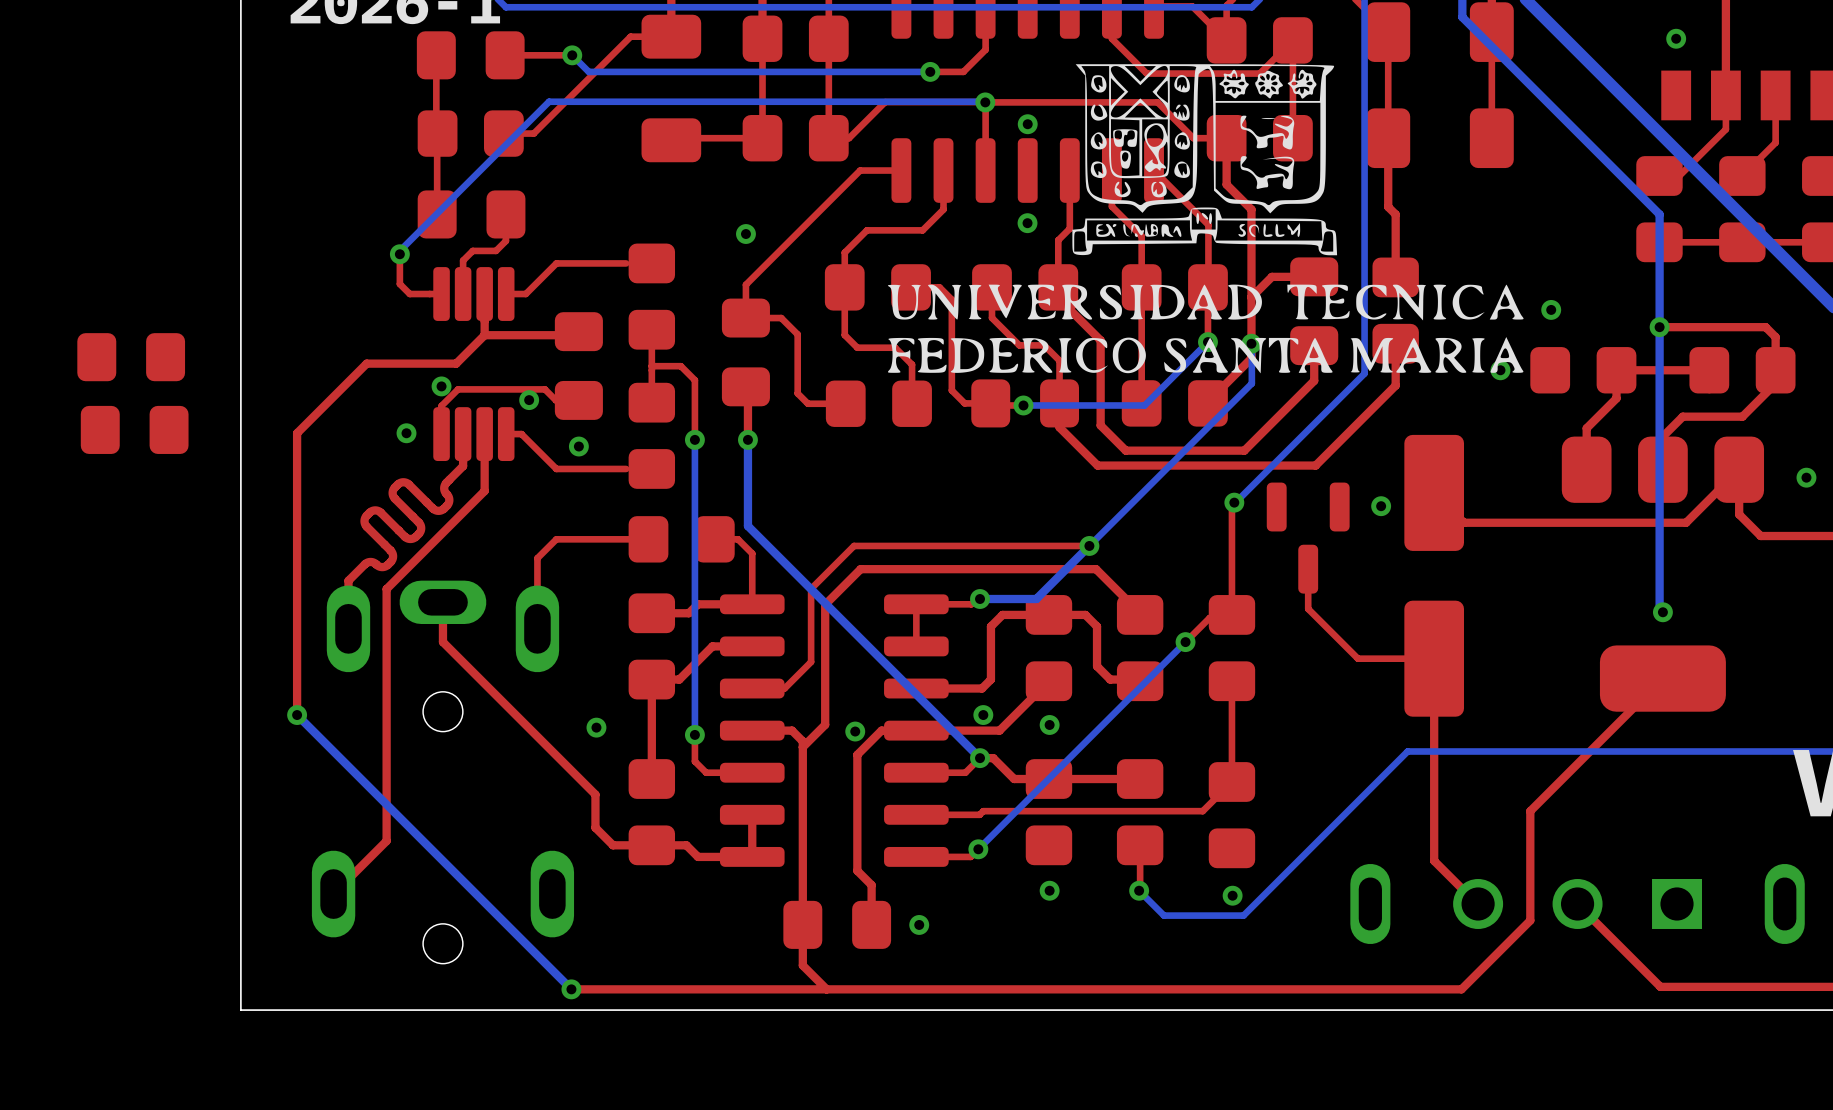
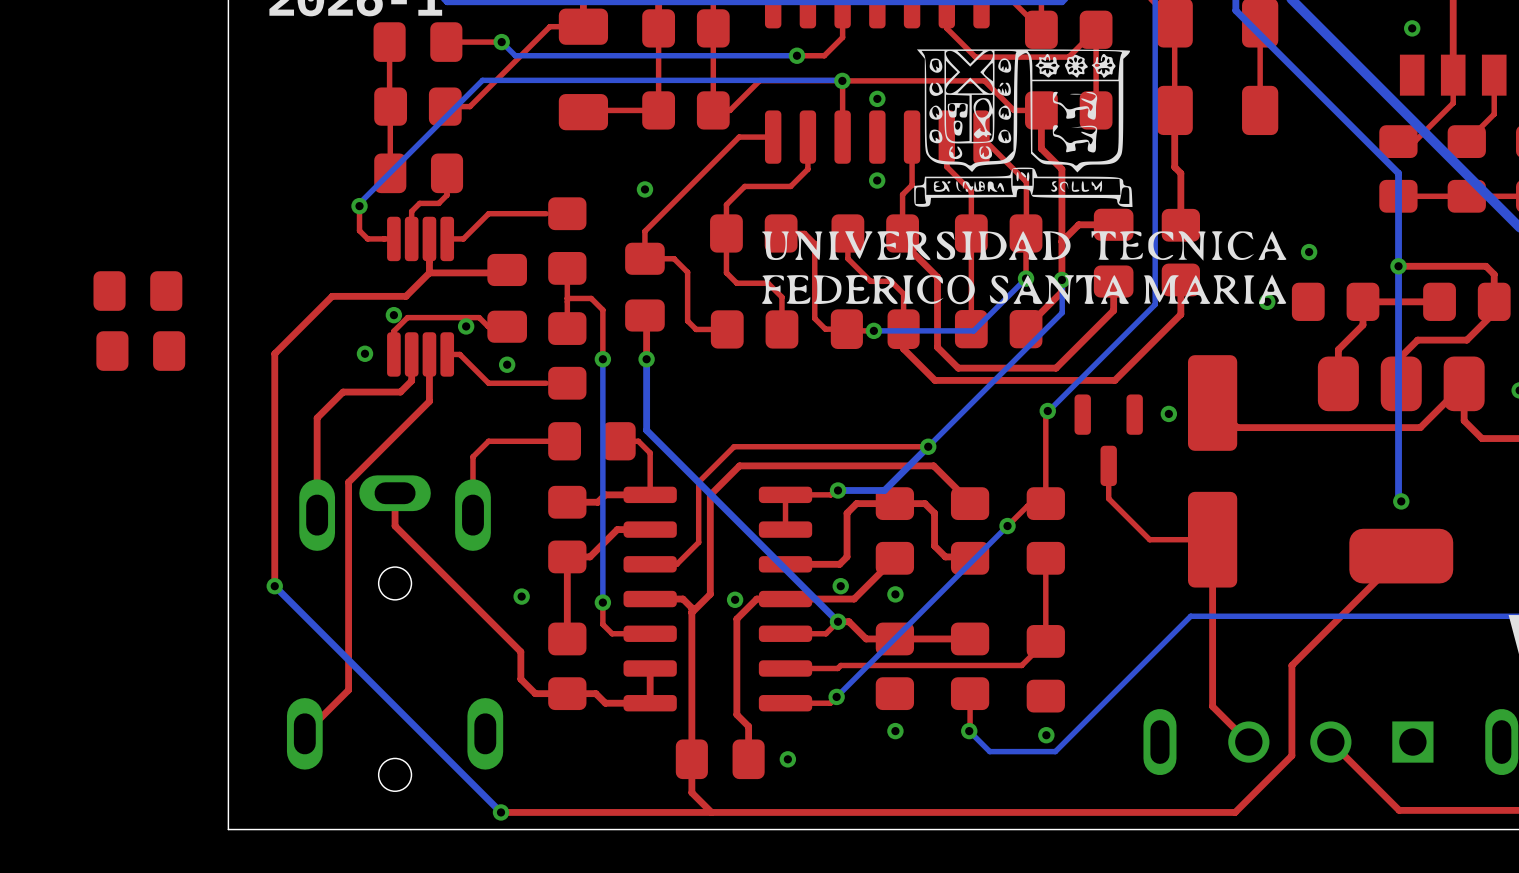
top track: (449, 479) (444, 488) (449, 502) (439, 510) (433, 509) (406, 483) (400, 482) (394, 487) (392, 492) (393, 497) (419, 523) (420, 532) (413, 538) (406, 538) (380, 512) (371, 511) (365, 517) (365, 524) (391, 551) (392, 558) (383, 567) (372, 562) (367, 562) (348, 580) -> (400, 392) (343, 392) (317, 418) (317, 475)

